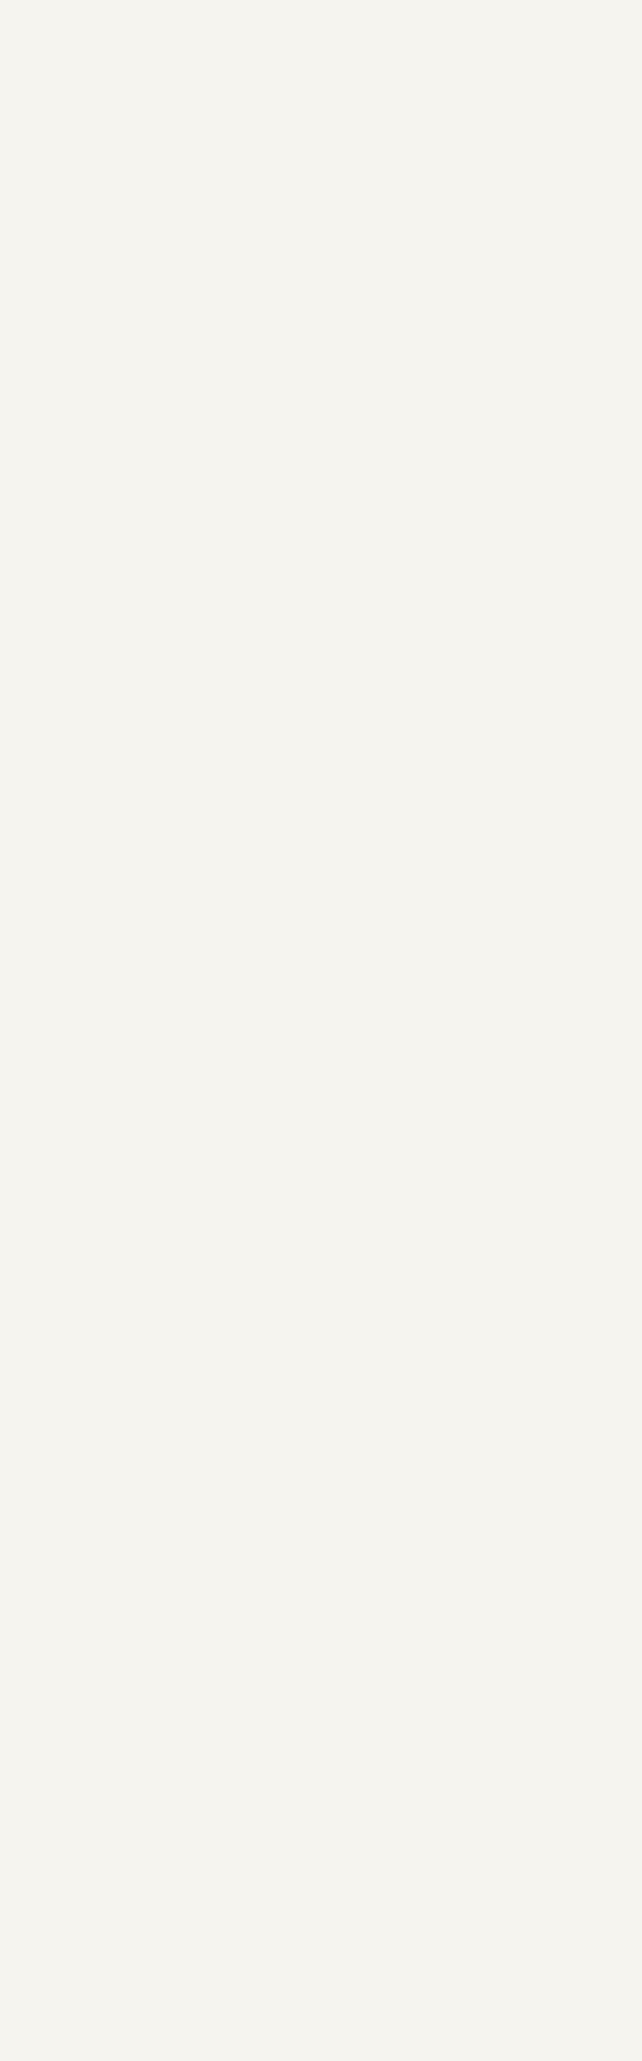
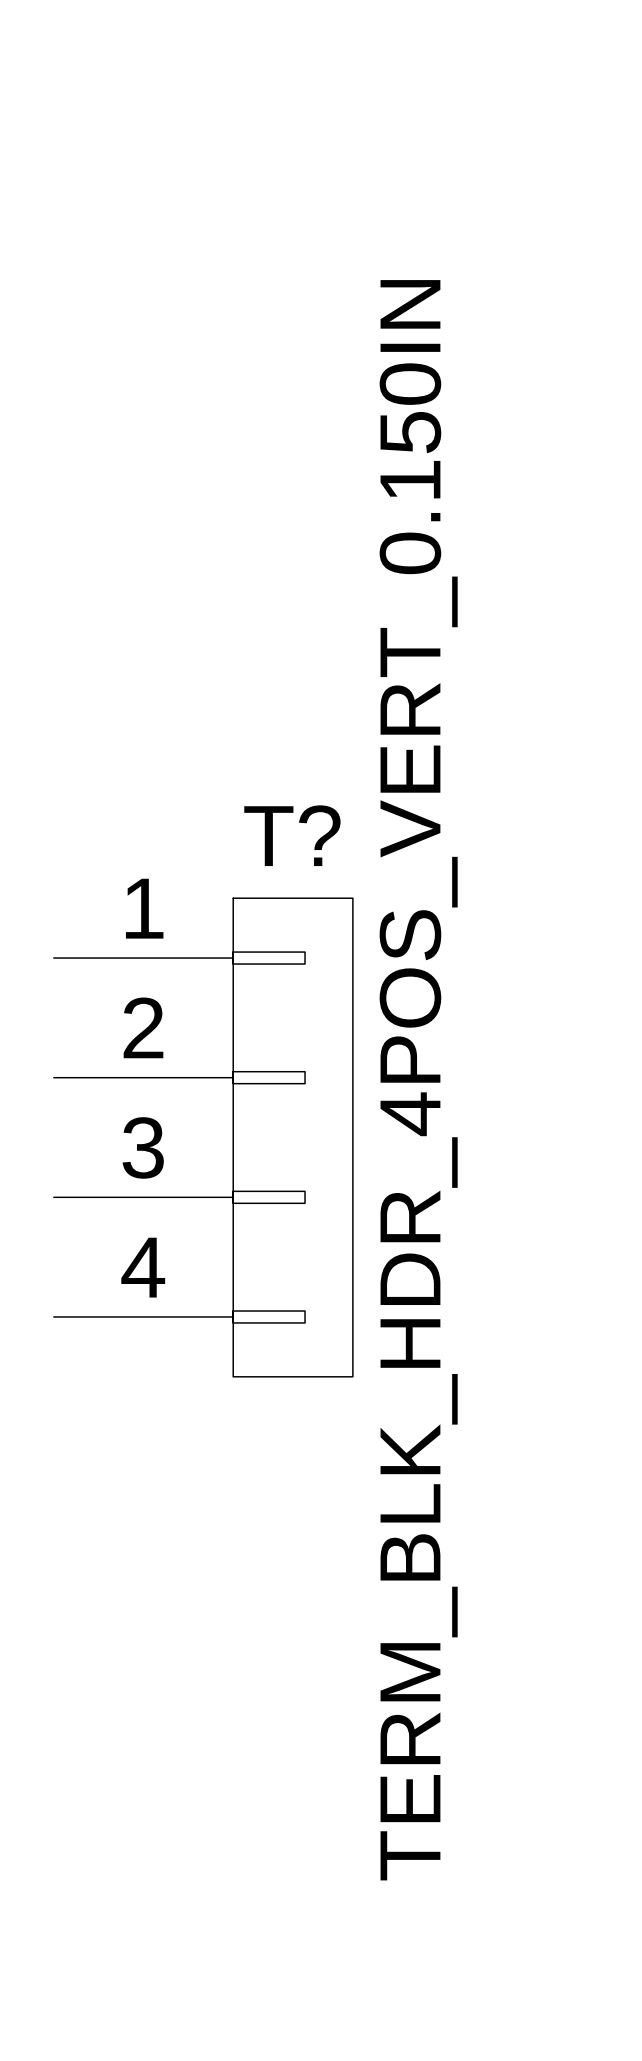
T?: none -> TERM_BLK_HDR_4POS_VERT_0.150IN (203, 1137)

